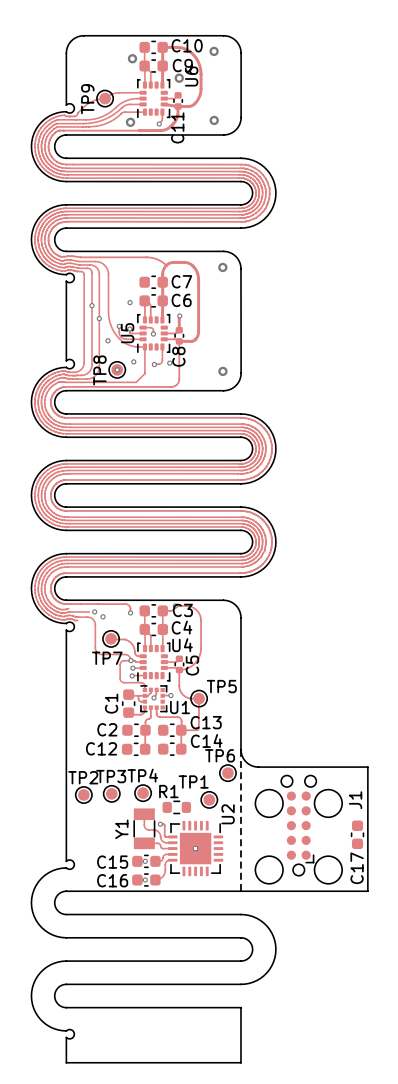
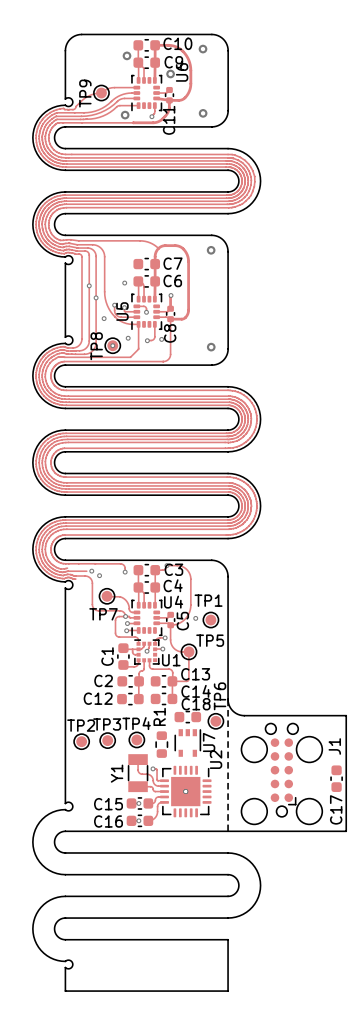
via: none -> (195, 618)
track: none -> (165, 637) (157, 638) (155, 643)
via: none -> (165, 637)
TP6 name rotation: 0° (220, 755) -> 90° counterclockwise (220, 696)
C18: none -> (187, 717)
TP1 name position: TP1 (193, 782) -> TP1 (208, 600)
U7: none -> (187, 742)
TP1 position: (209, 799) -> (210, 620)
R1 rotation: 0° (176, 807) -> 90° clockwise (161, 744)

